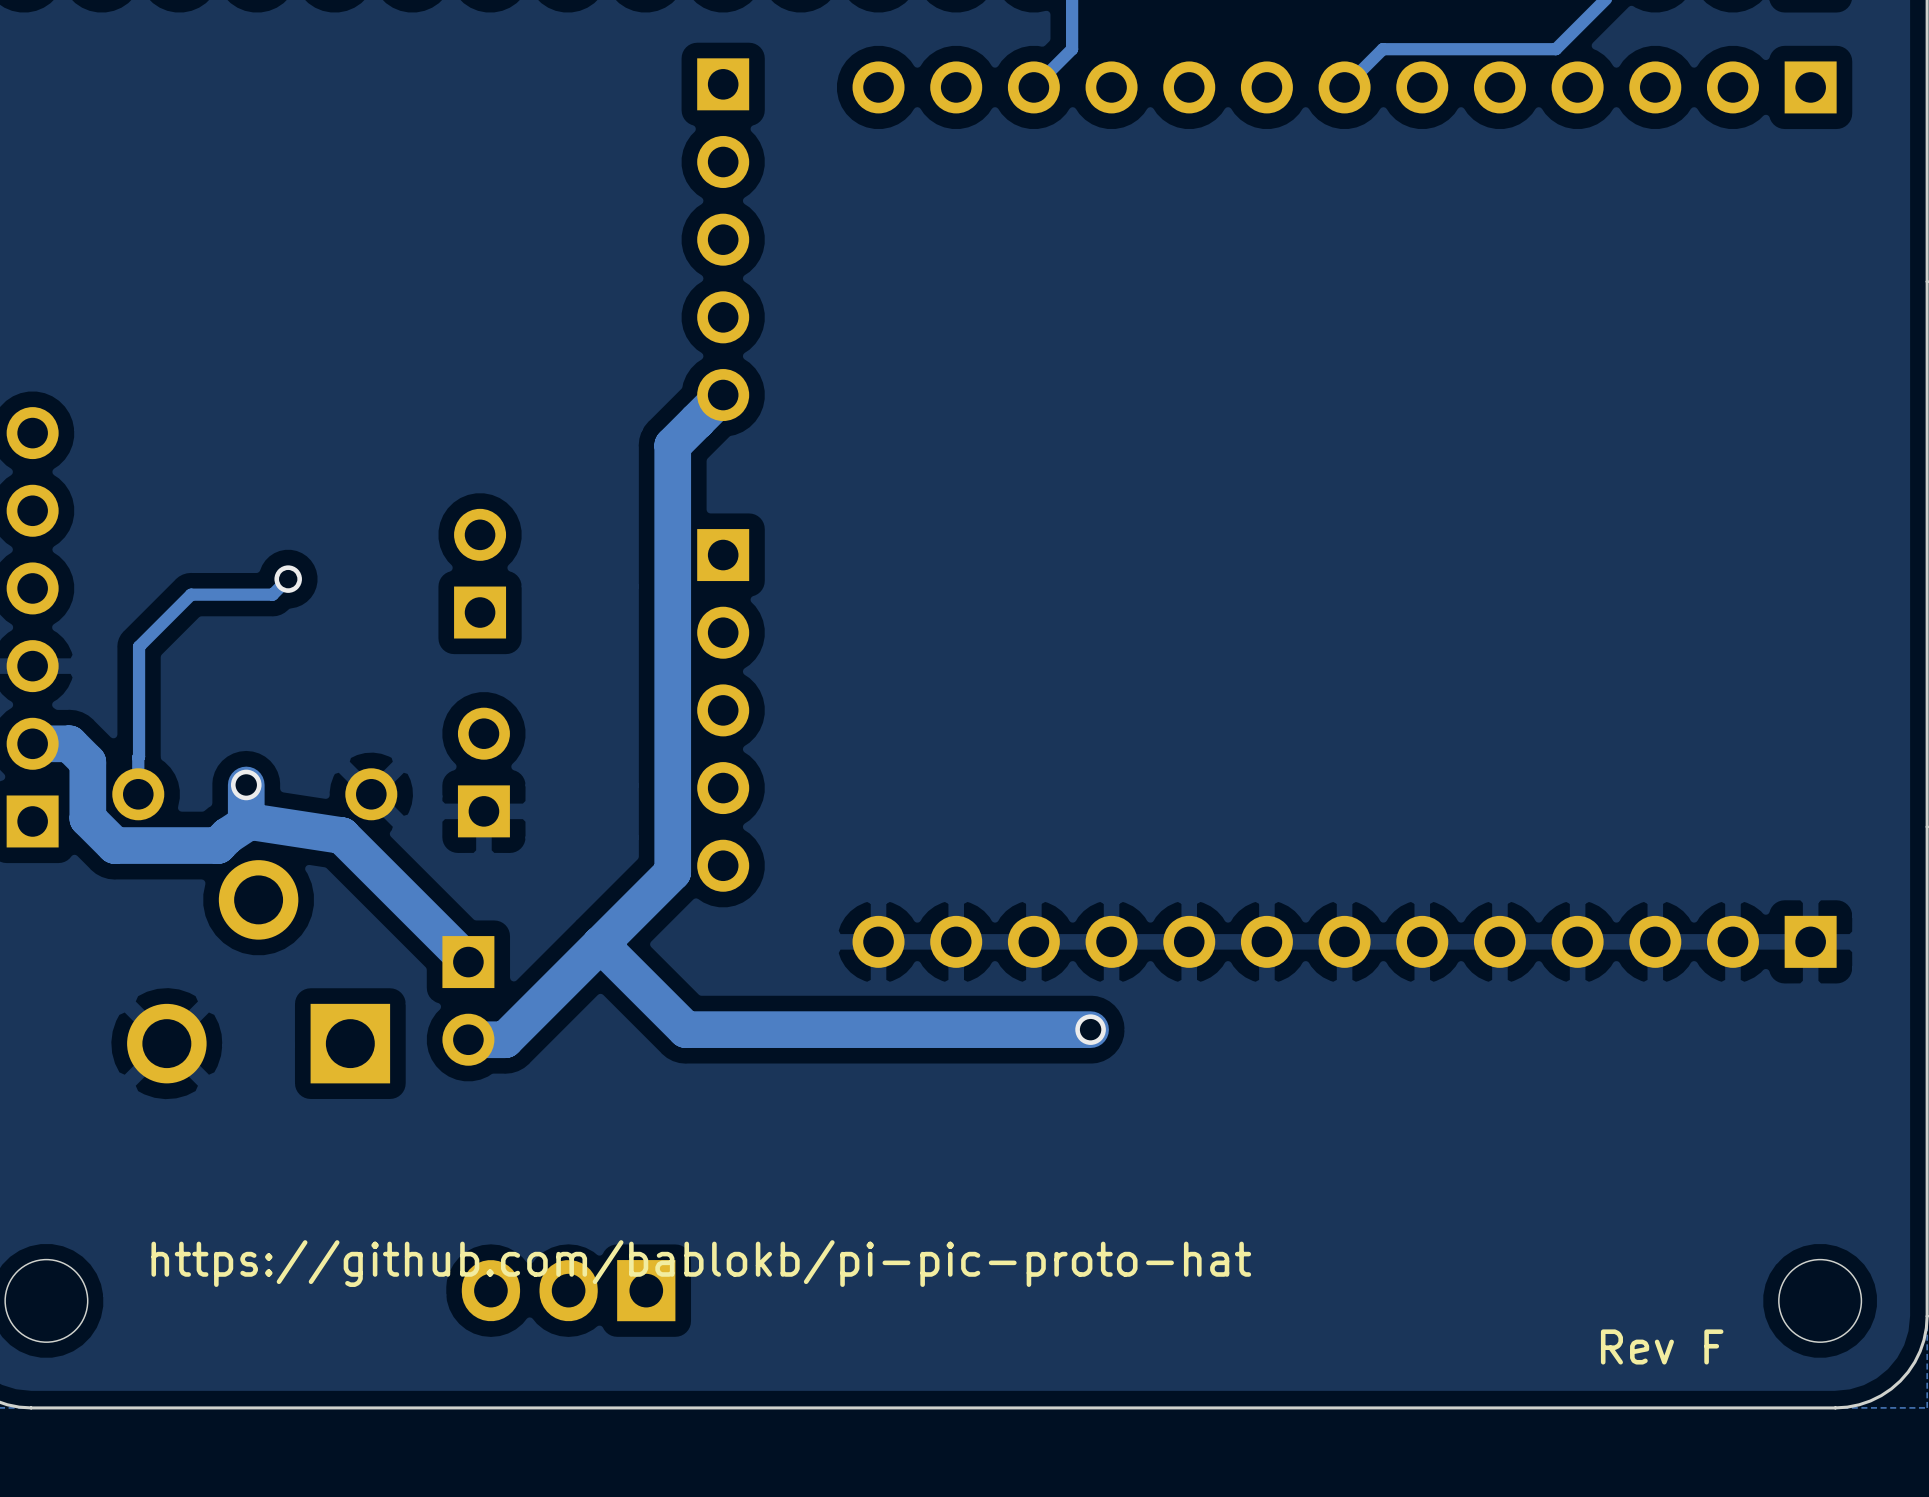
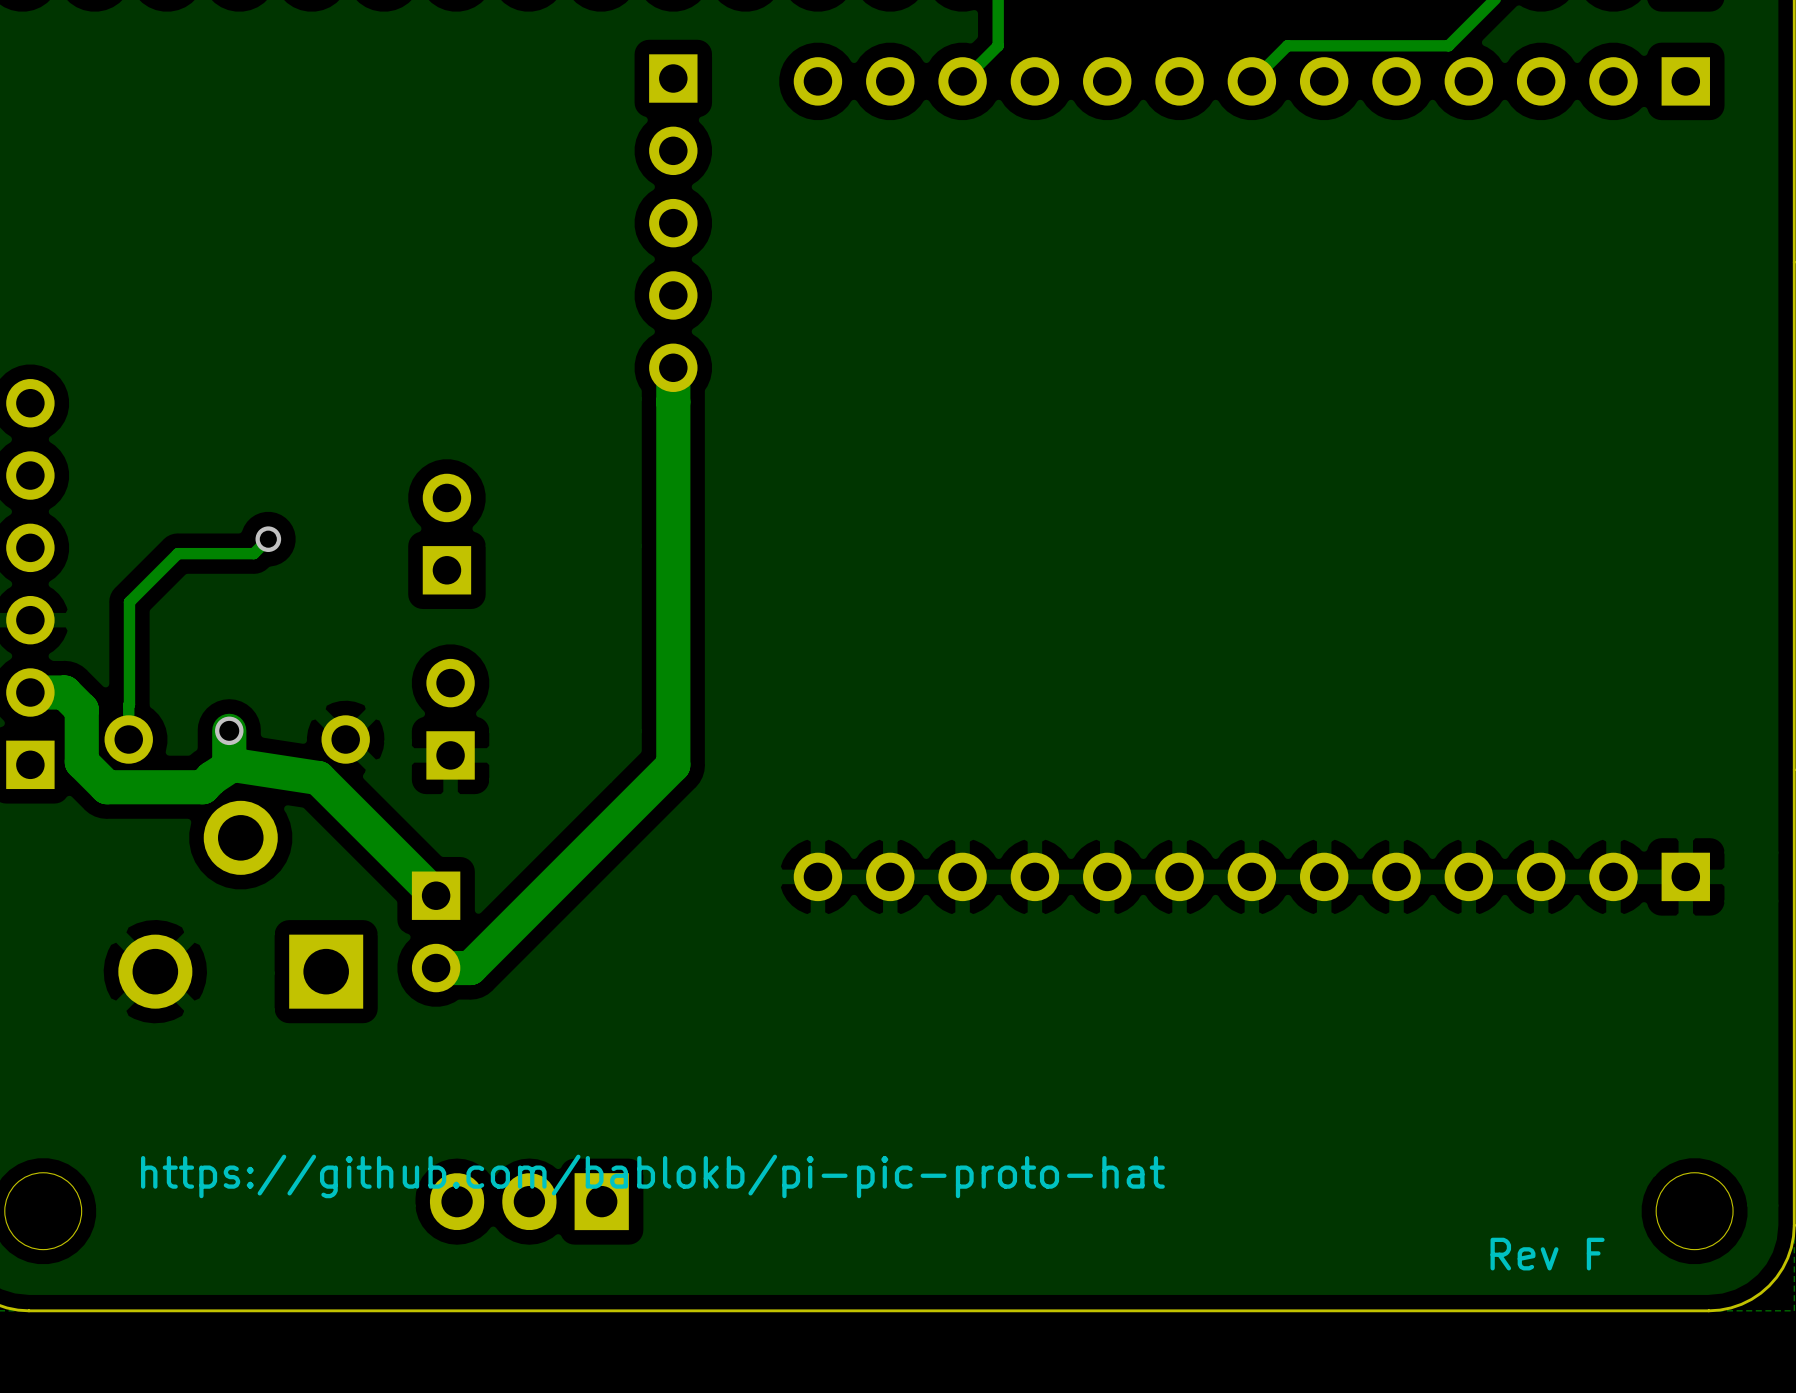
track: (723, 395) (672, 445) (672, 872) -> (673, 367) (673, 765) (626, 812)
part: (723, 710) -> none
track: (600, 944) (685, 1029) (1090, 1029) -> none
via: (1090, 1029) -> none

